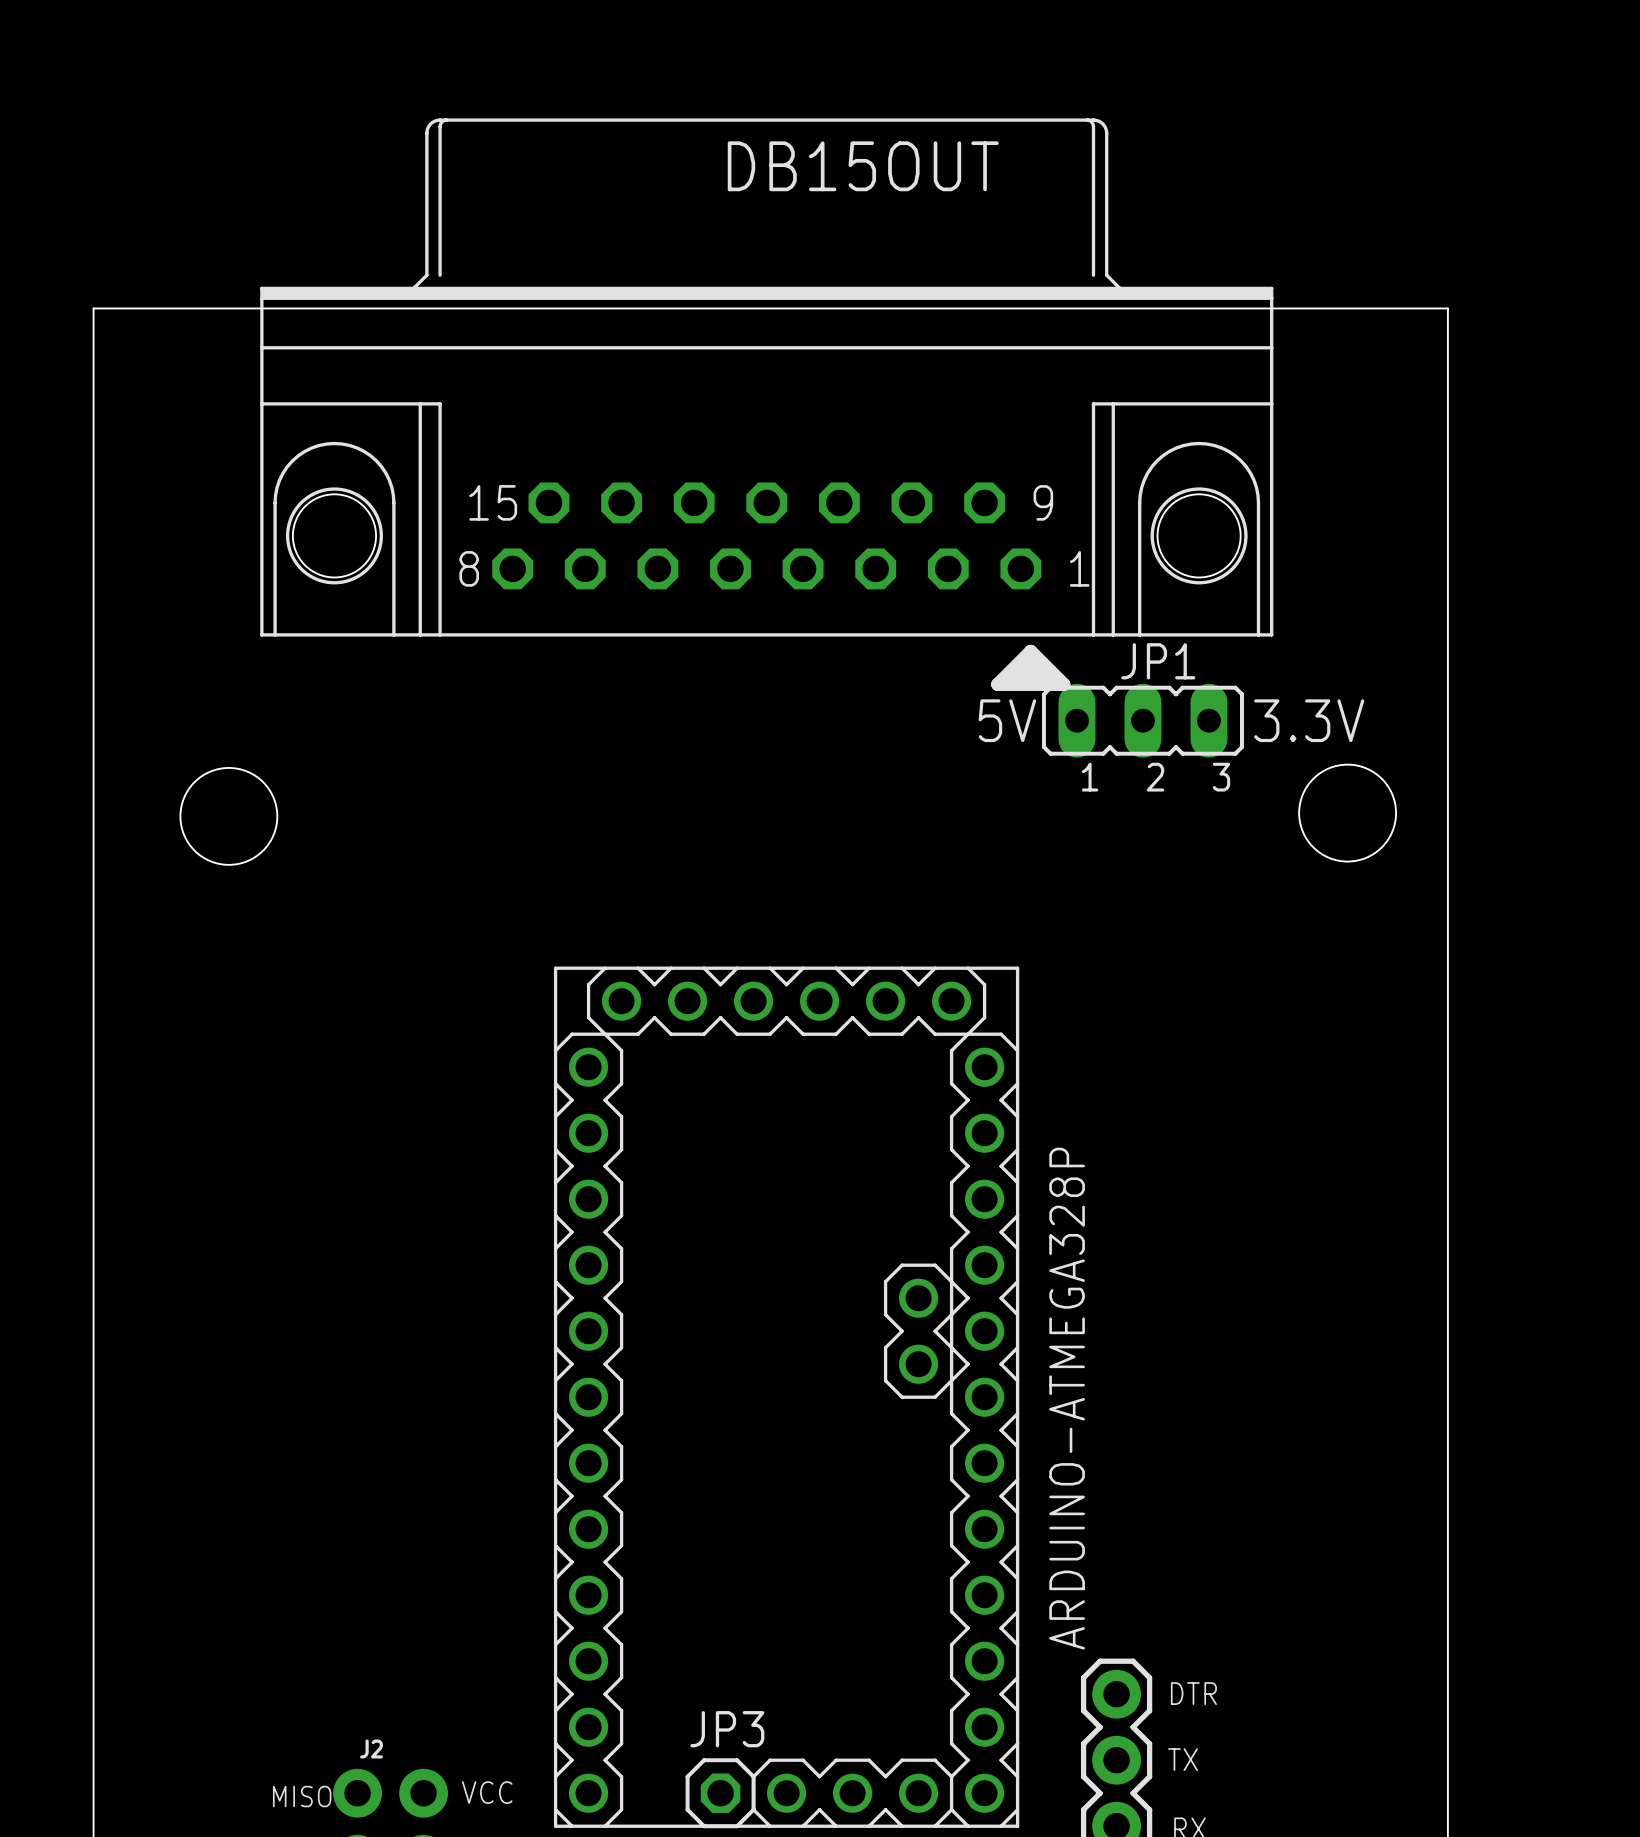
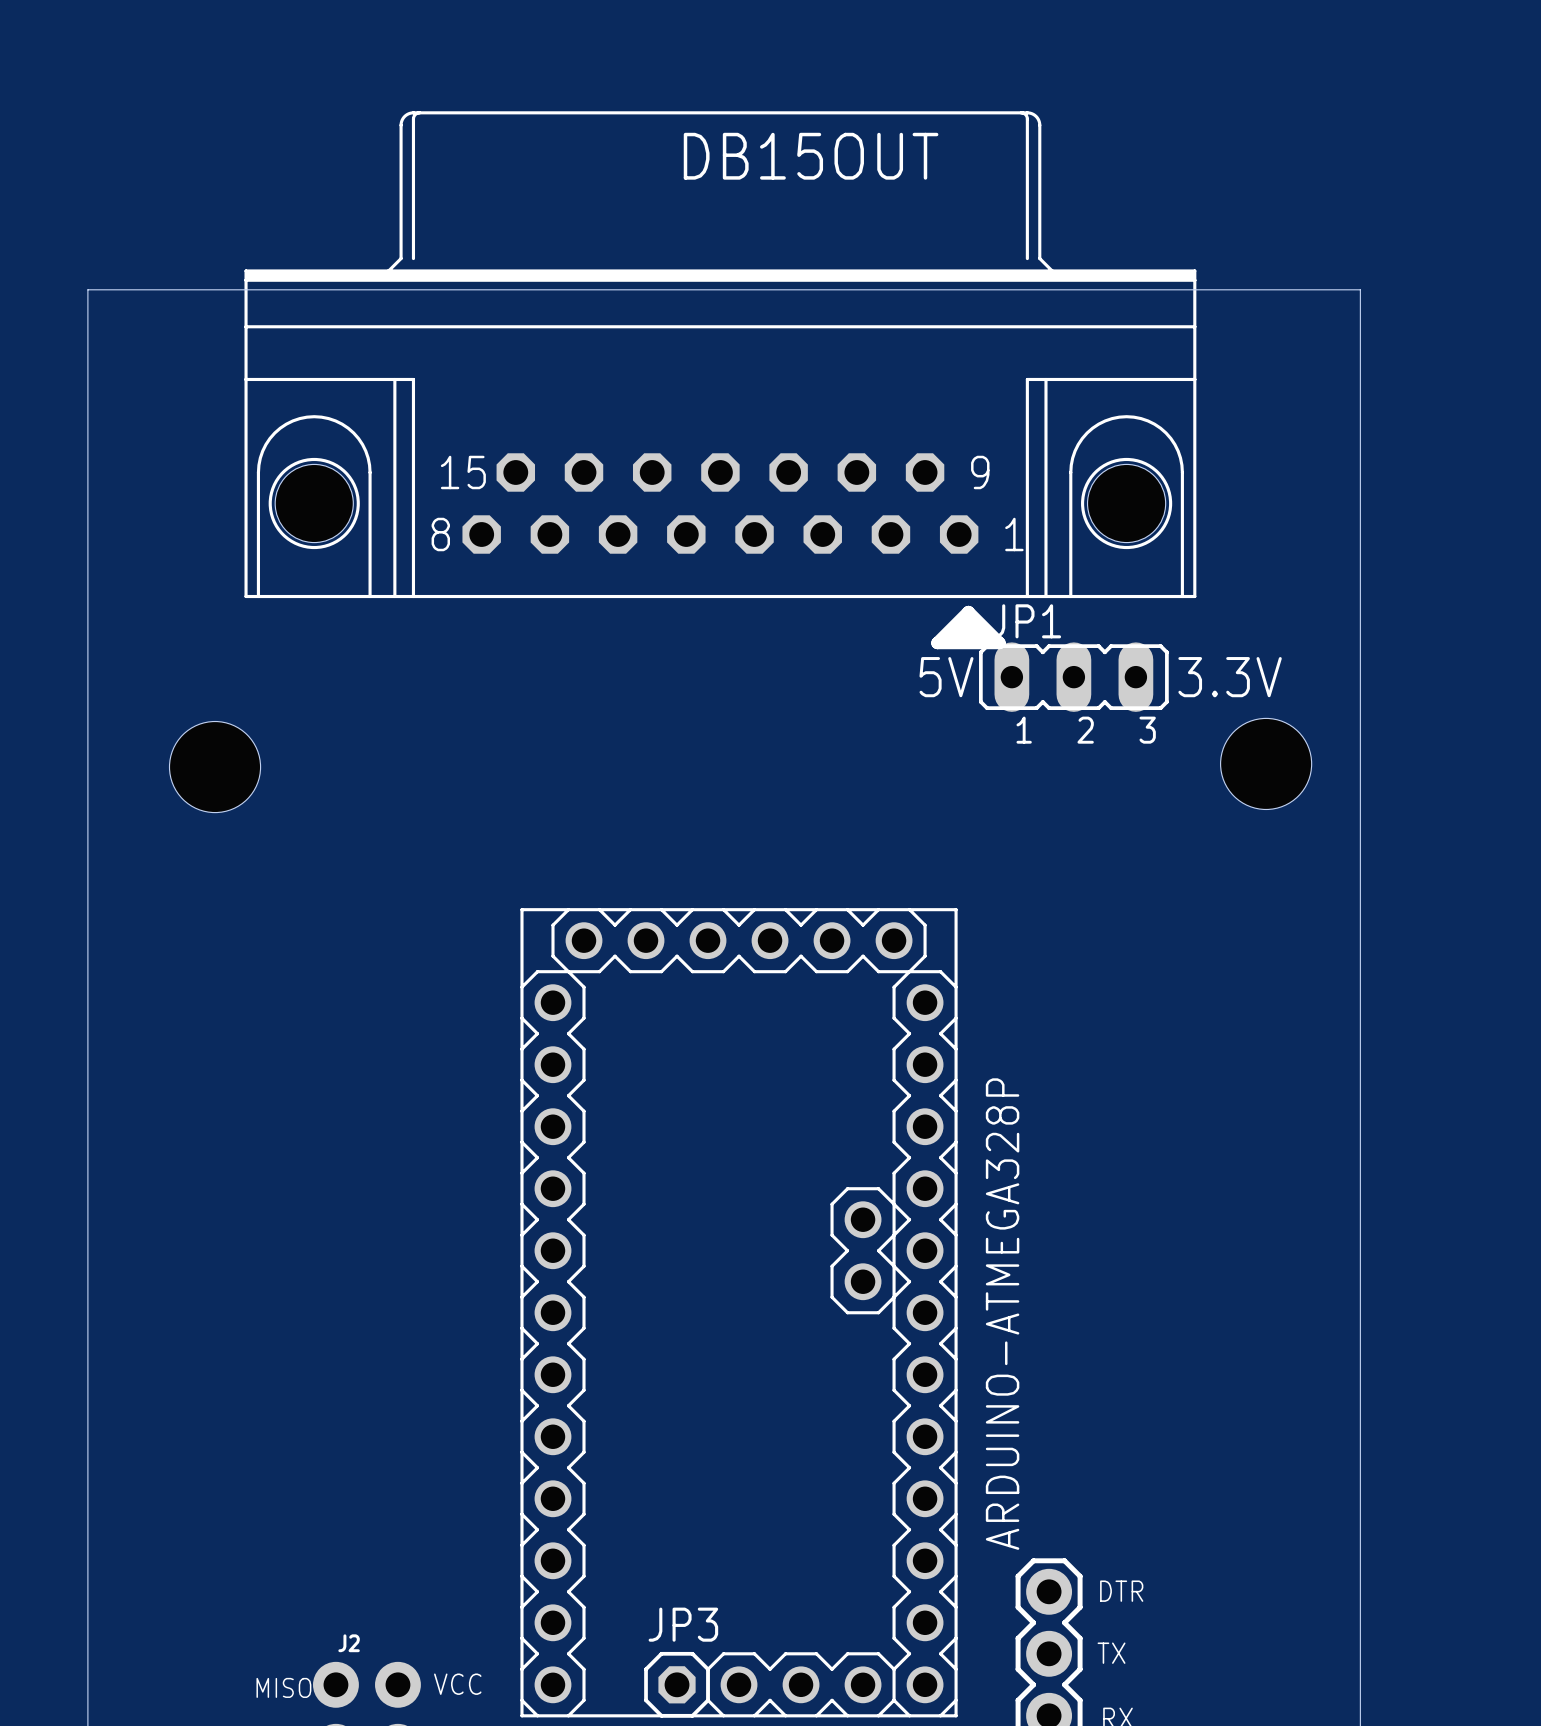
JP1 name position: JP1 (1158, 661) -> JP1 (1026, 621)

